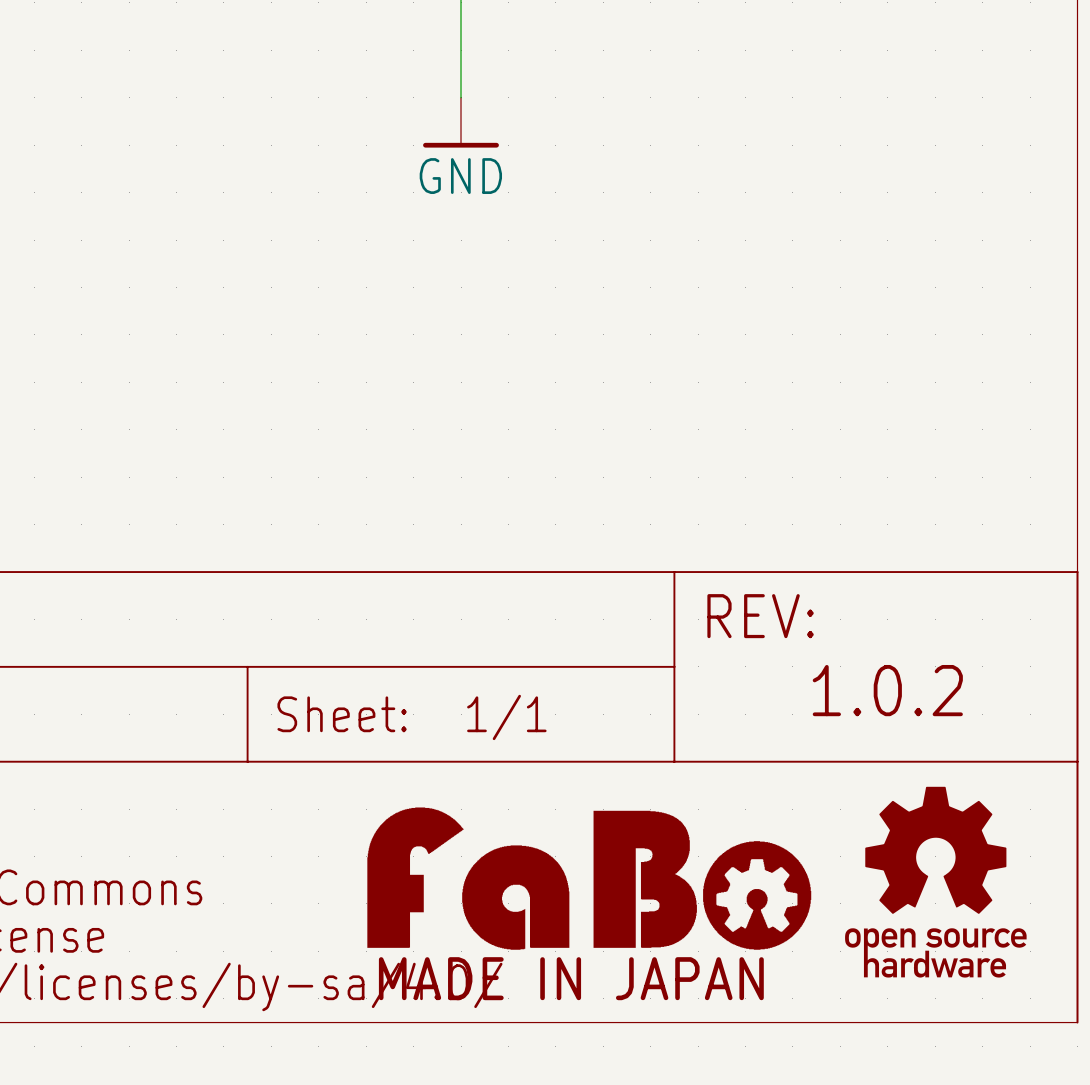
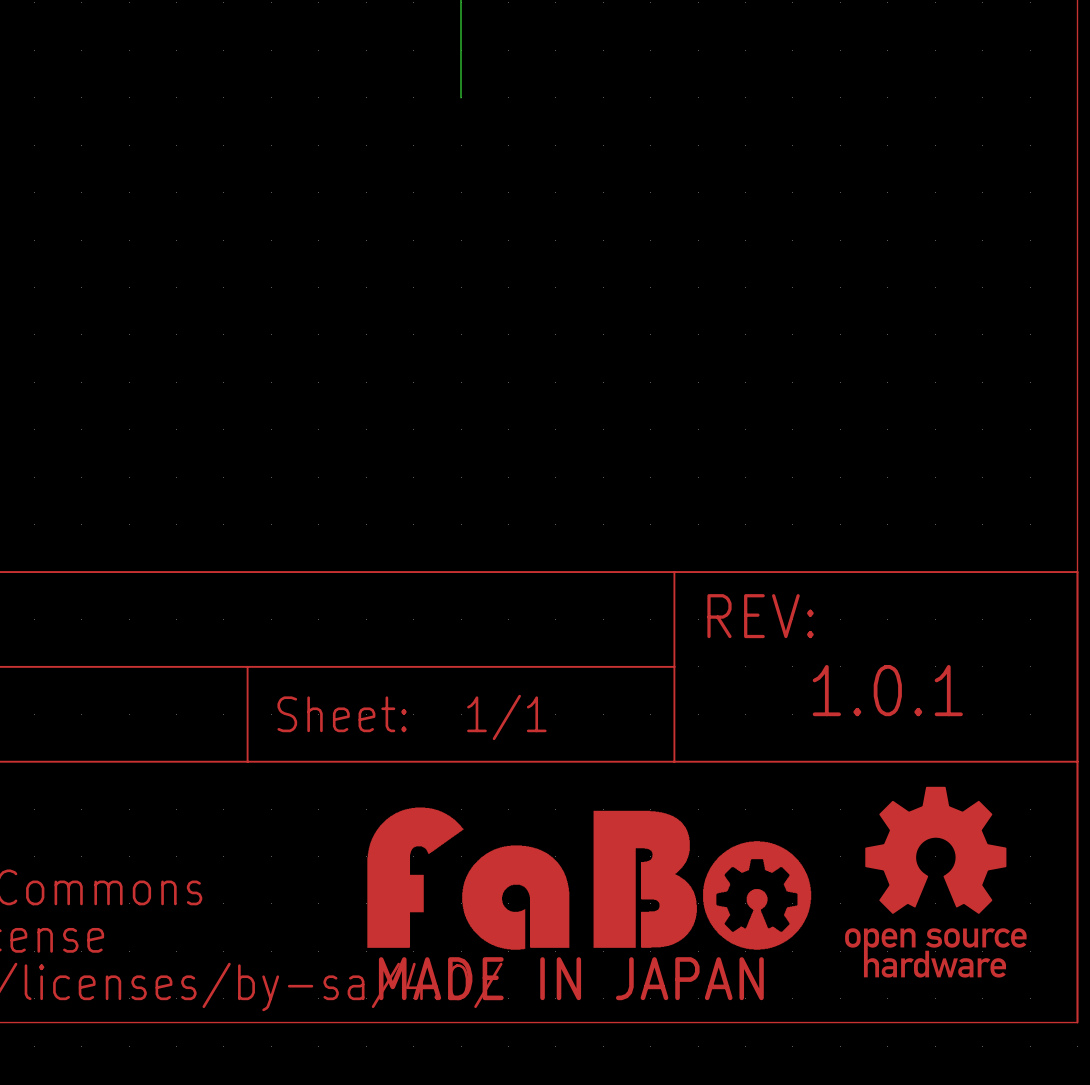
power symbol: GND (461, 122) -> none
text: 1.0.2 (887, 690) -> 1.0.1 (887, 690)

